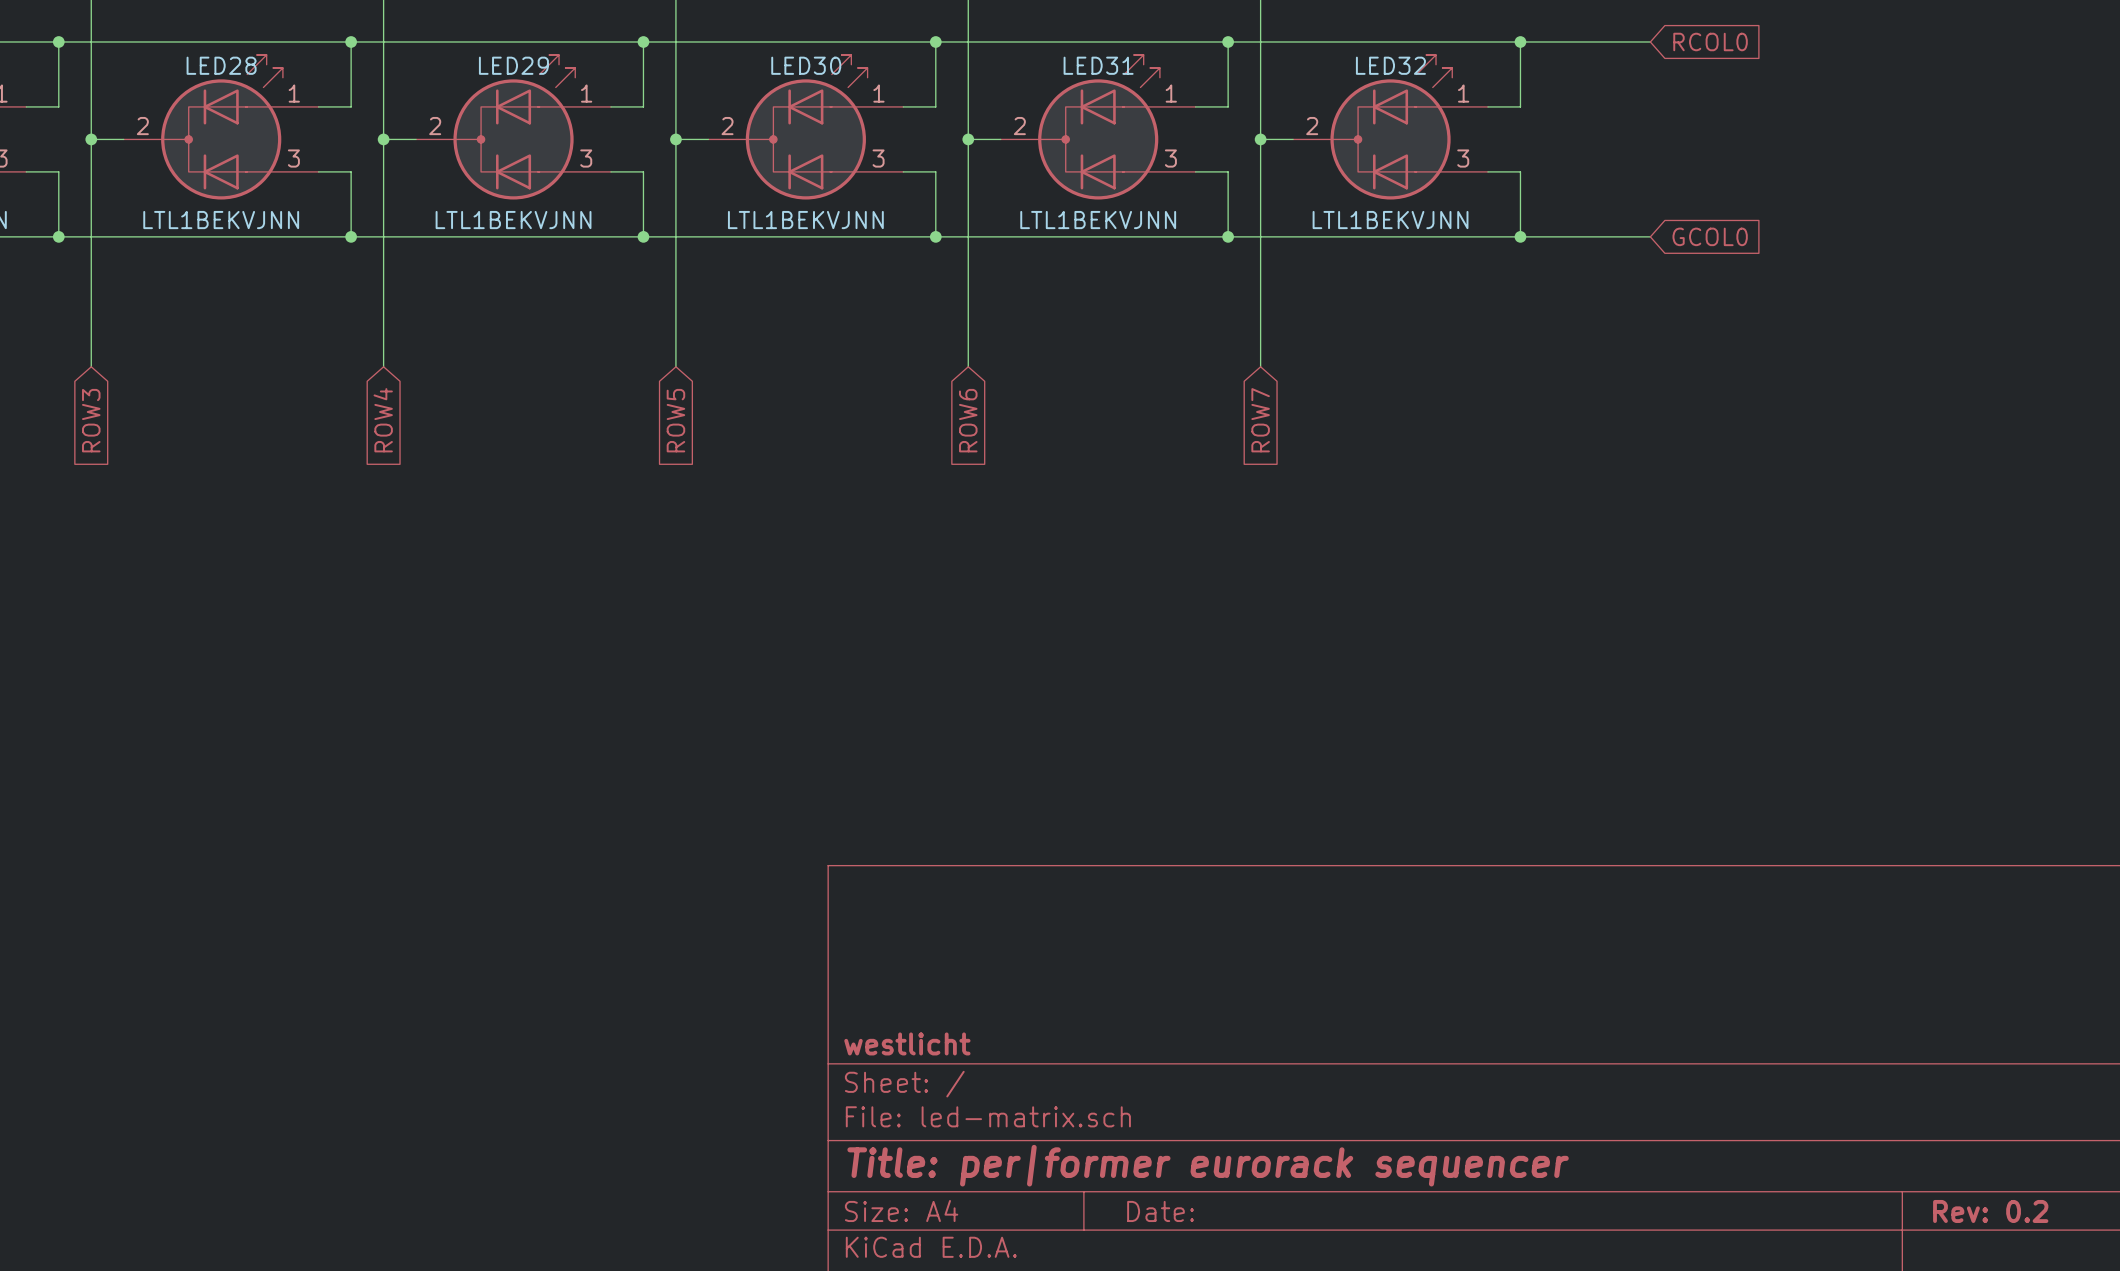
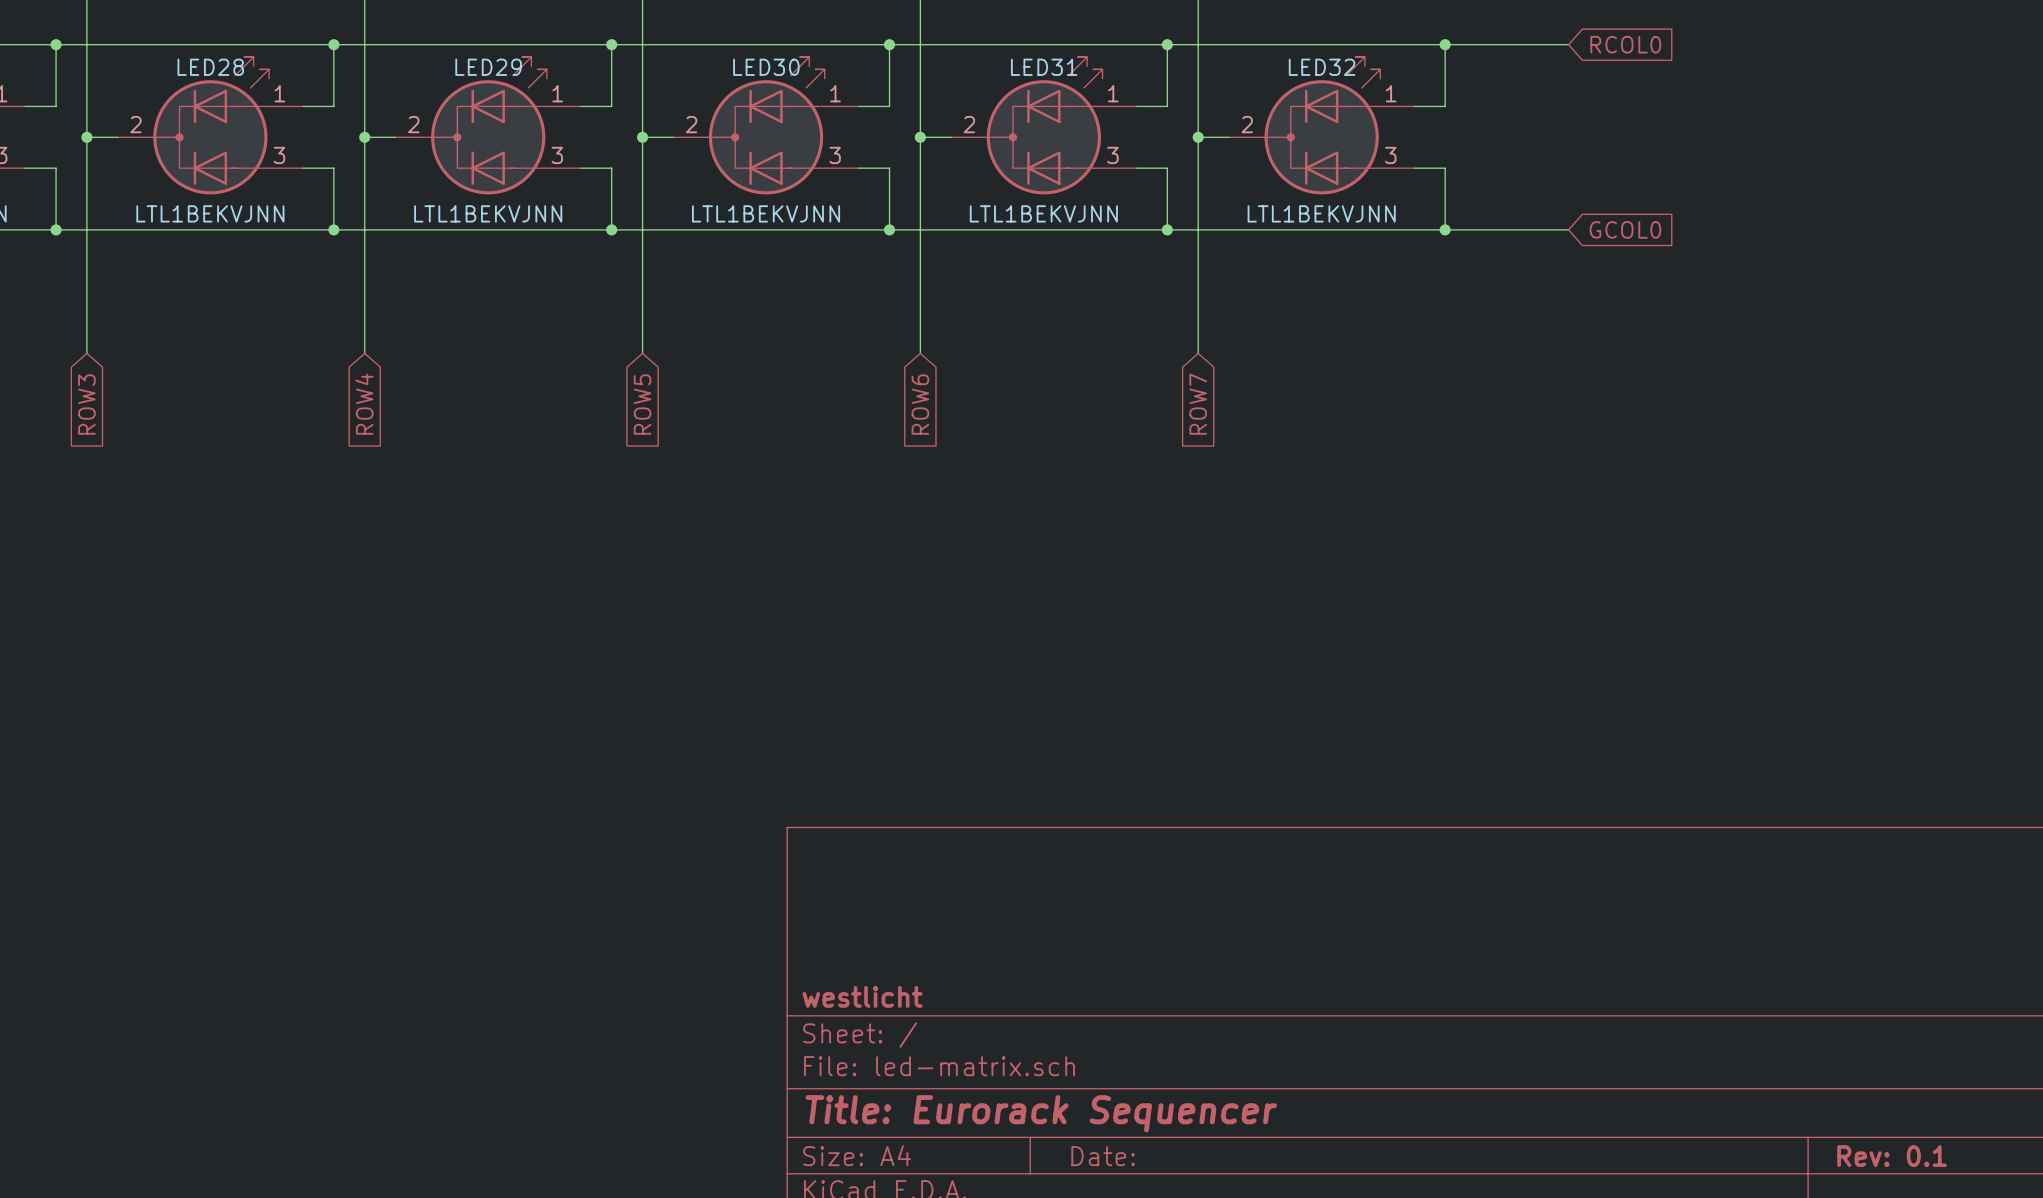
title block: Title: per|former eurorack sequencer (1208, 1165) -> Title: Eurorack Sequencer (1041, 1113)
title block: Rev: 0.2 (1990, 1211) -> Rev: 0.1 (1892, 1156)

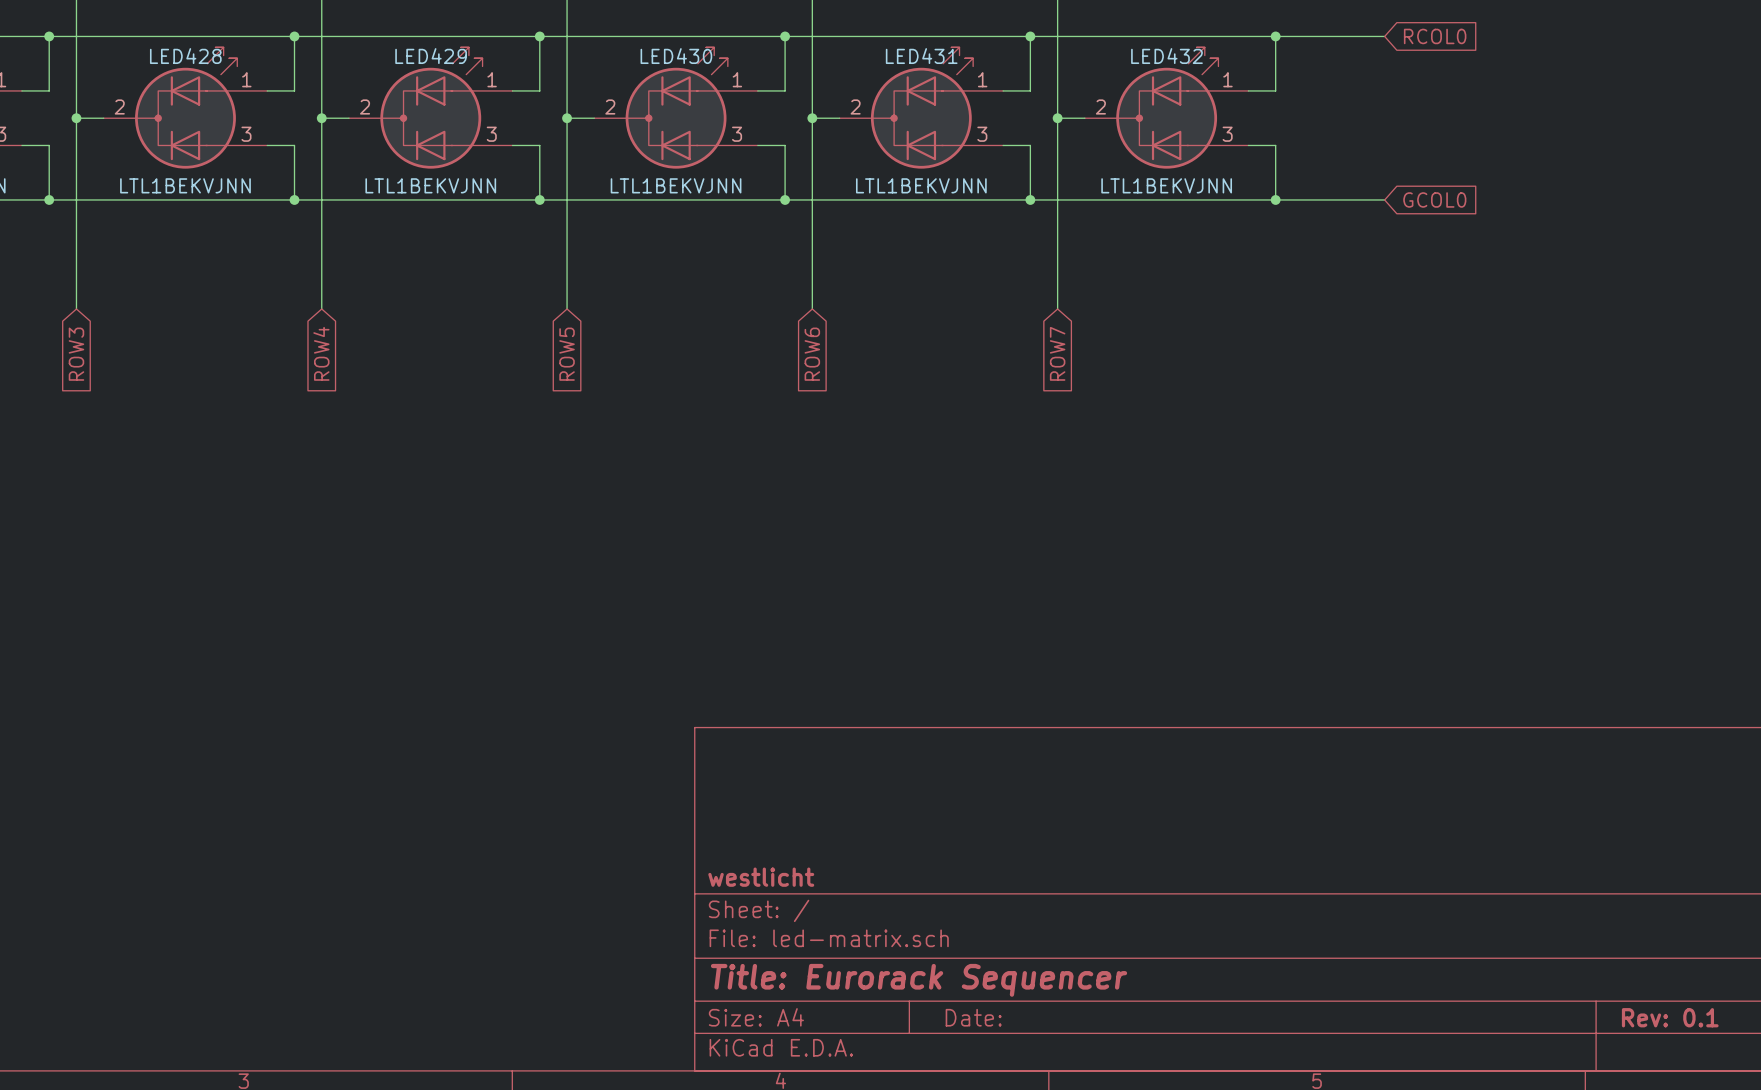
LED28 name: LED28 (210, 67) -> LED428 (185, 56)
LED29 name: LED29 (488, 67) -> LED429 (431, 56)
LED30 name: LED30 (766, 67) -> LED430 (676, 56)
LED31 name: LED31 (1044, 67) -> LED431 (921, 56)
LED32 name: LED32 (1322, 67) -> LED432 (1166, 56)

